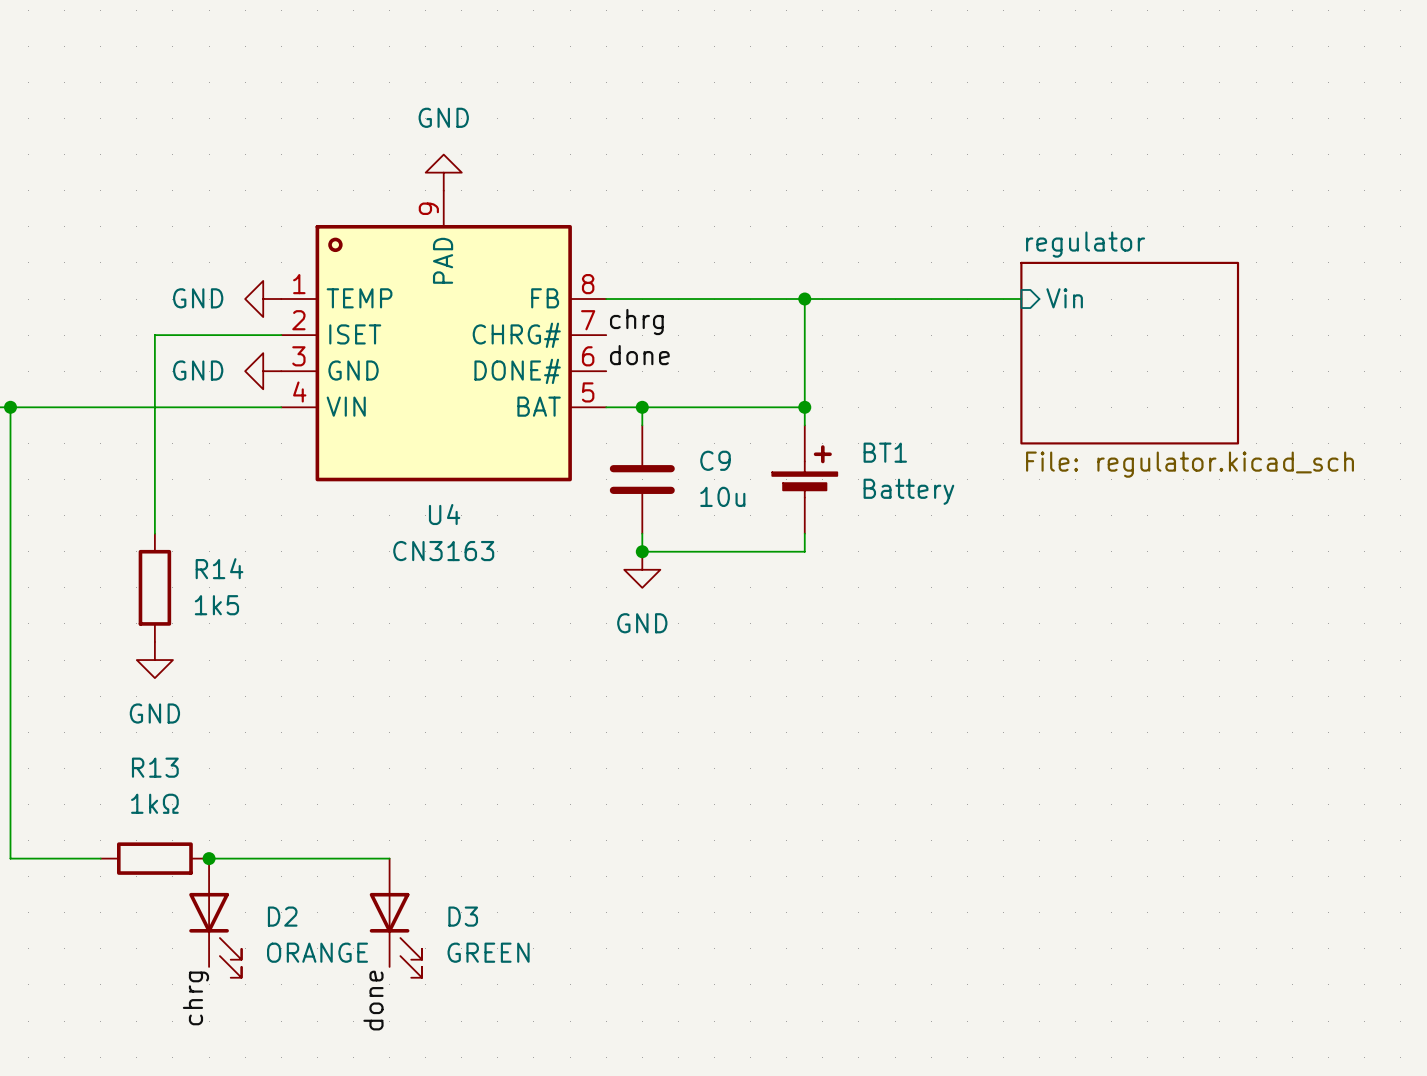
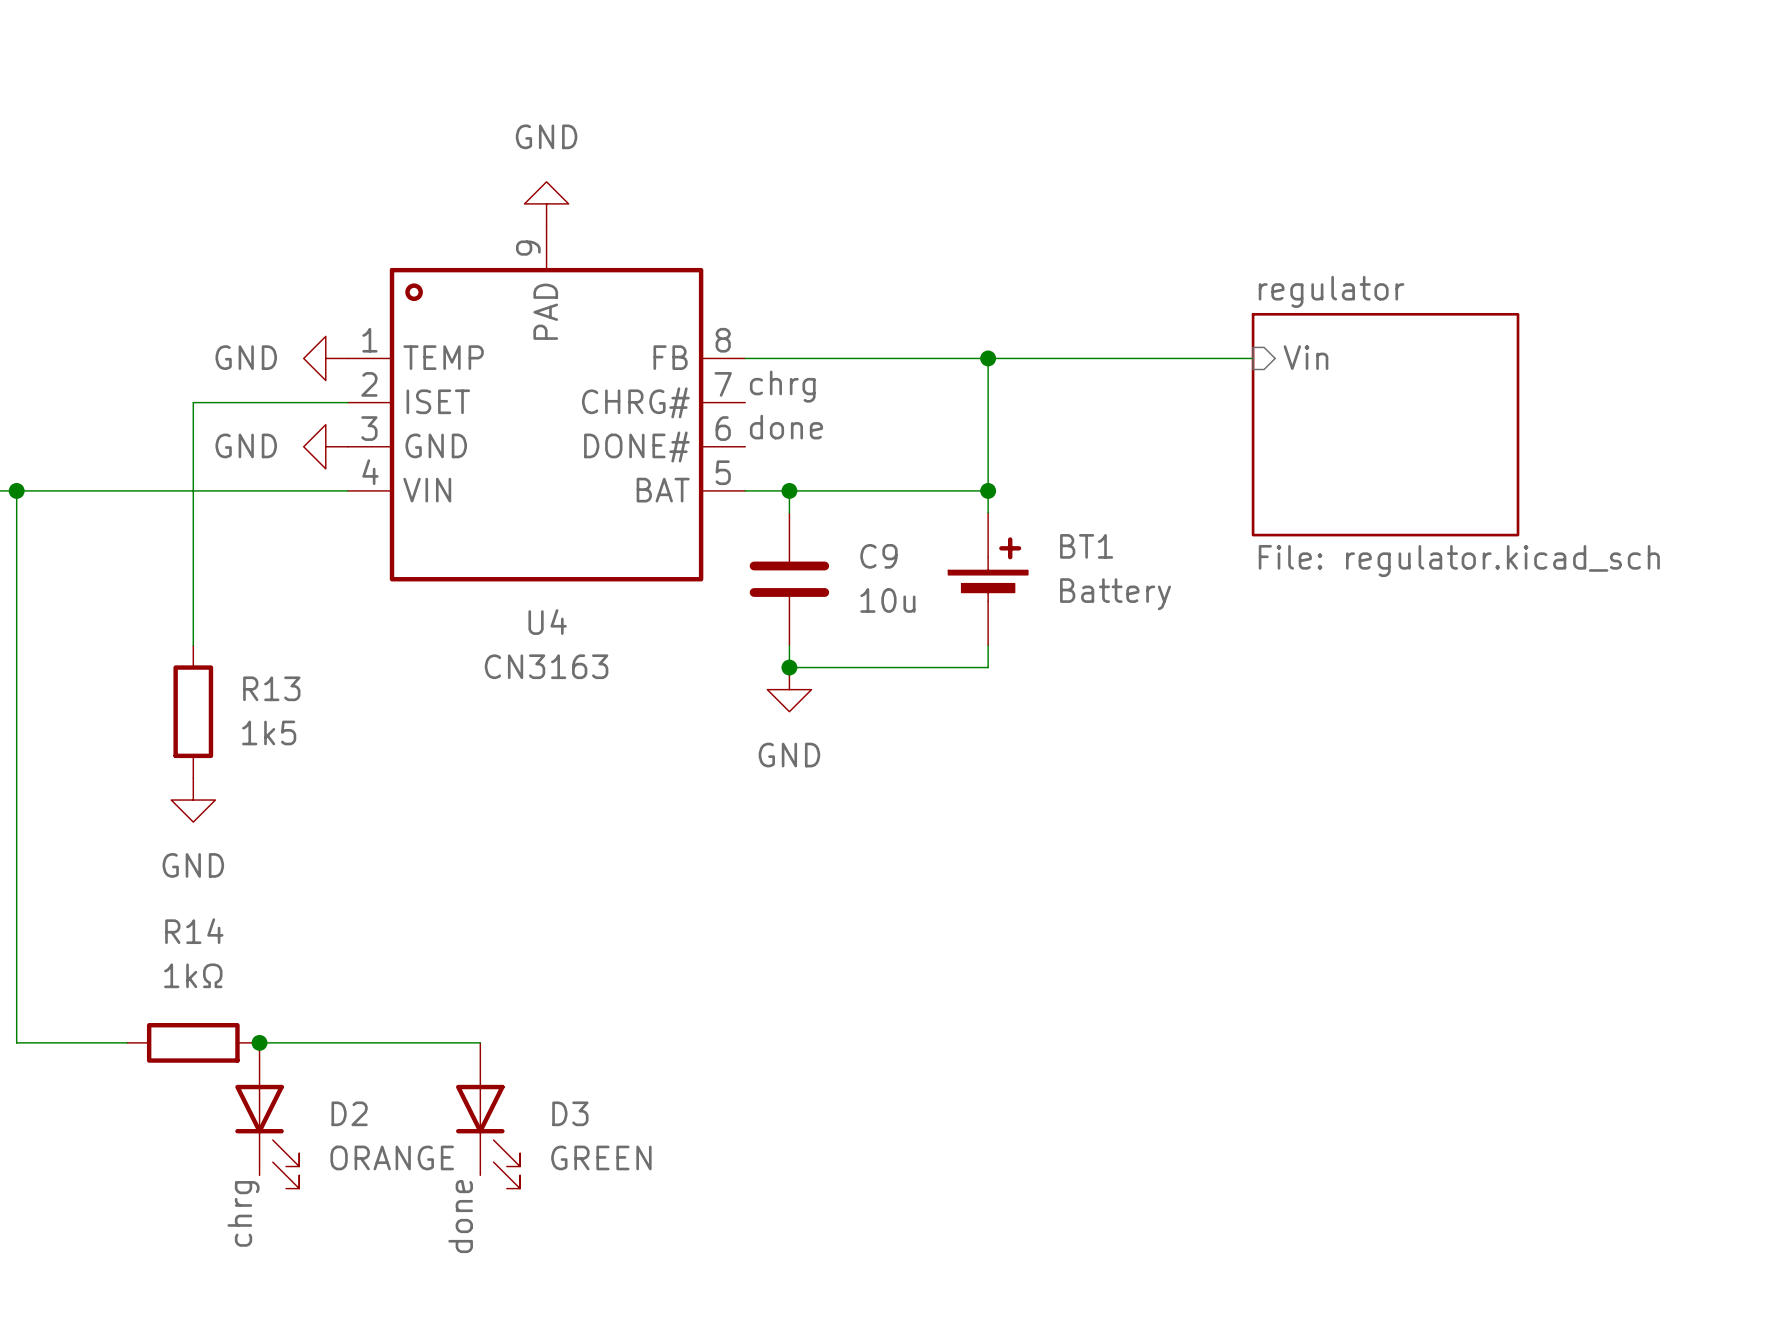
R14 name: R14 (219, 568) -> R13 (271, 688)
R13 name: R13 (155, 767) -> R14 (194, 931)

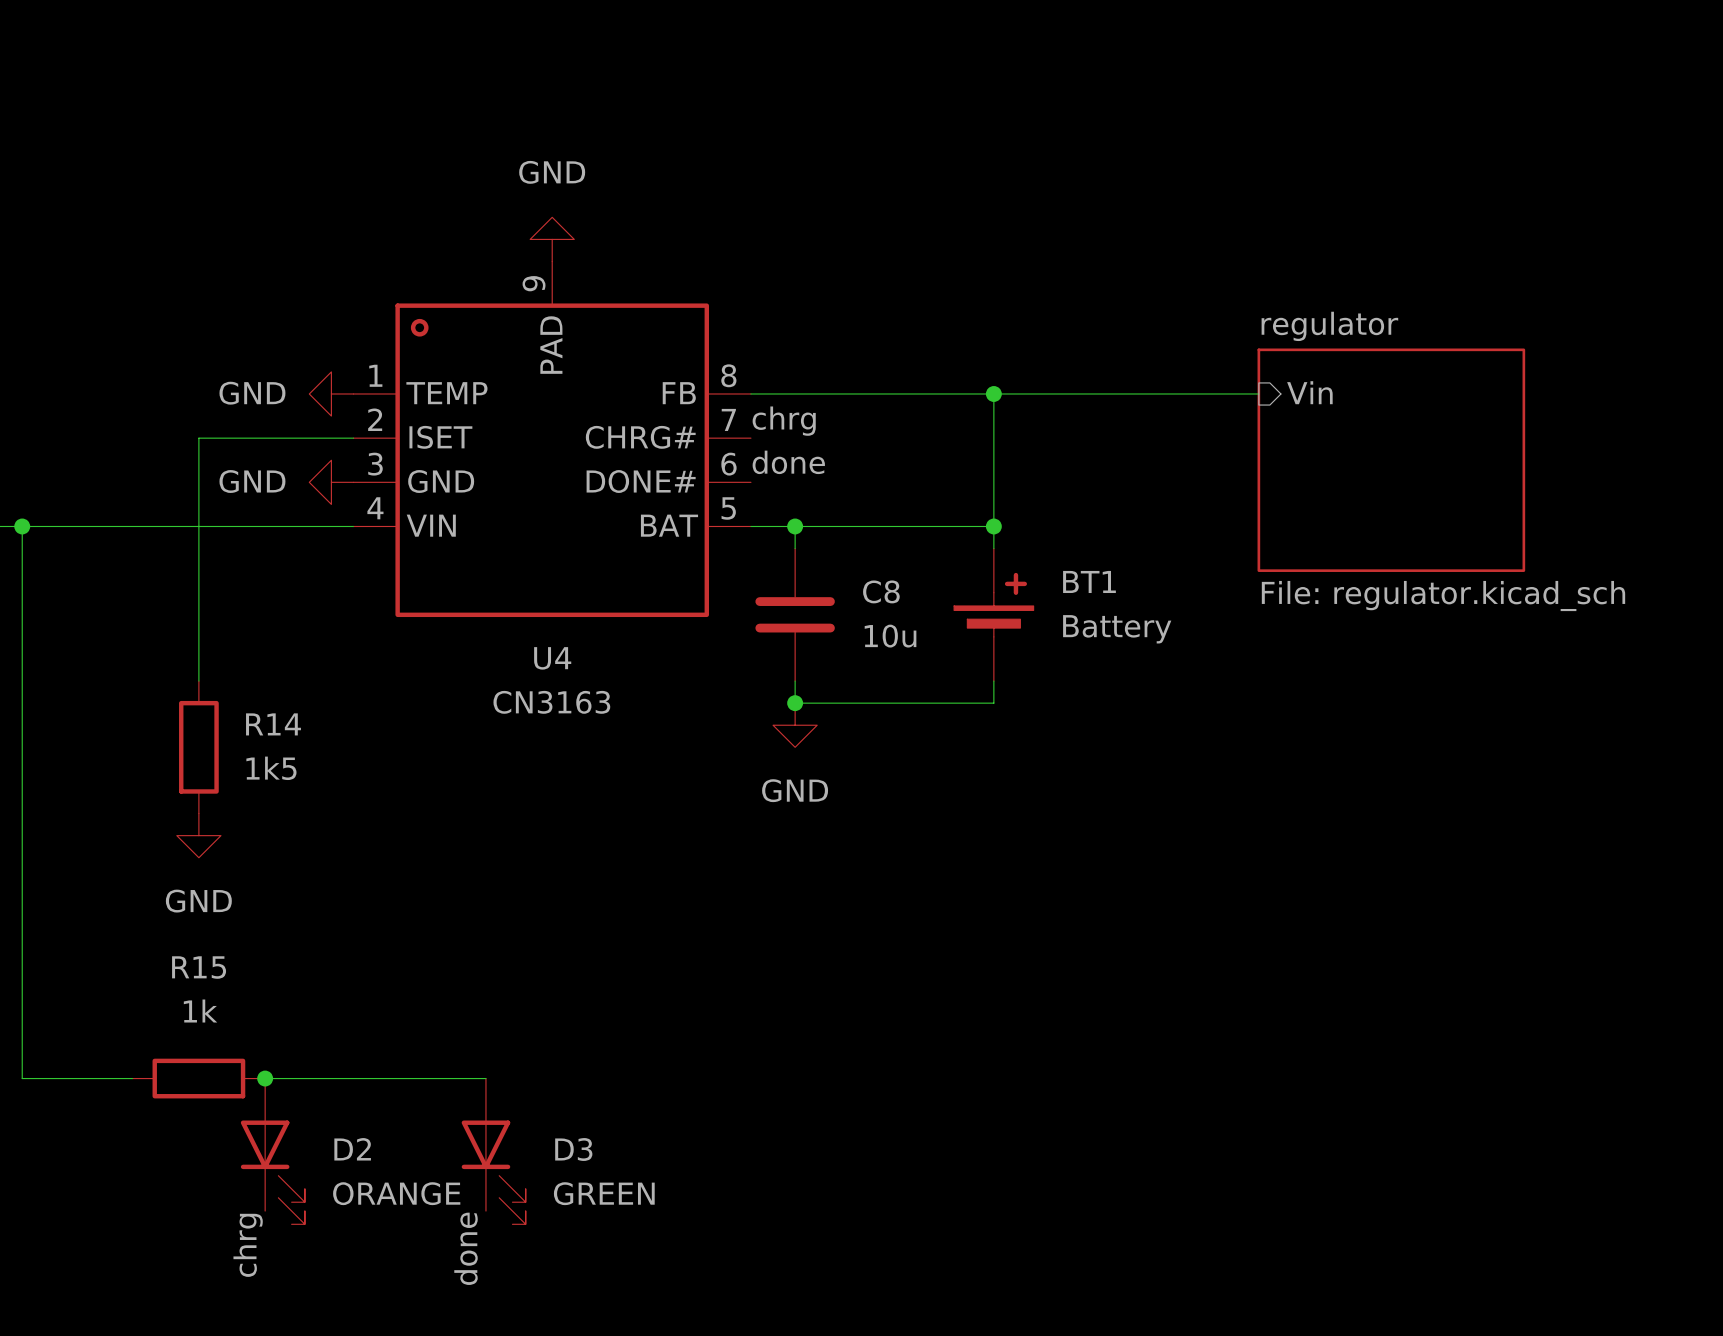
C9 name: C9 (878, 556) -> C8 (881, 591)
R13 name: R13 (271, 688) -> R14 (273, 724)
R14 name: R14 (194, 931) -> R15 (199, 967)
R14 value: 1kΩ (193, 975) -> 1k (200, 1011)

